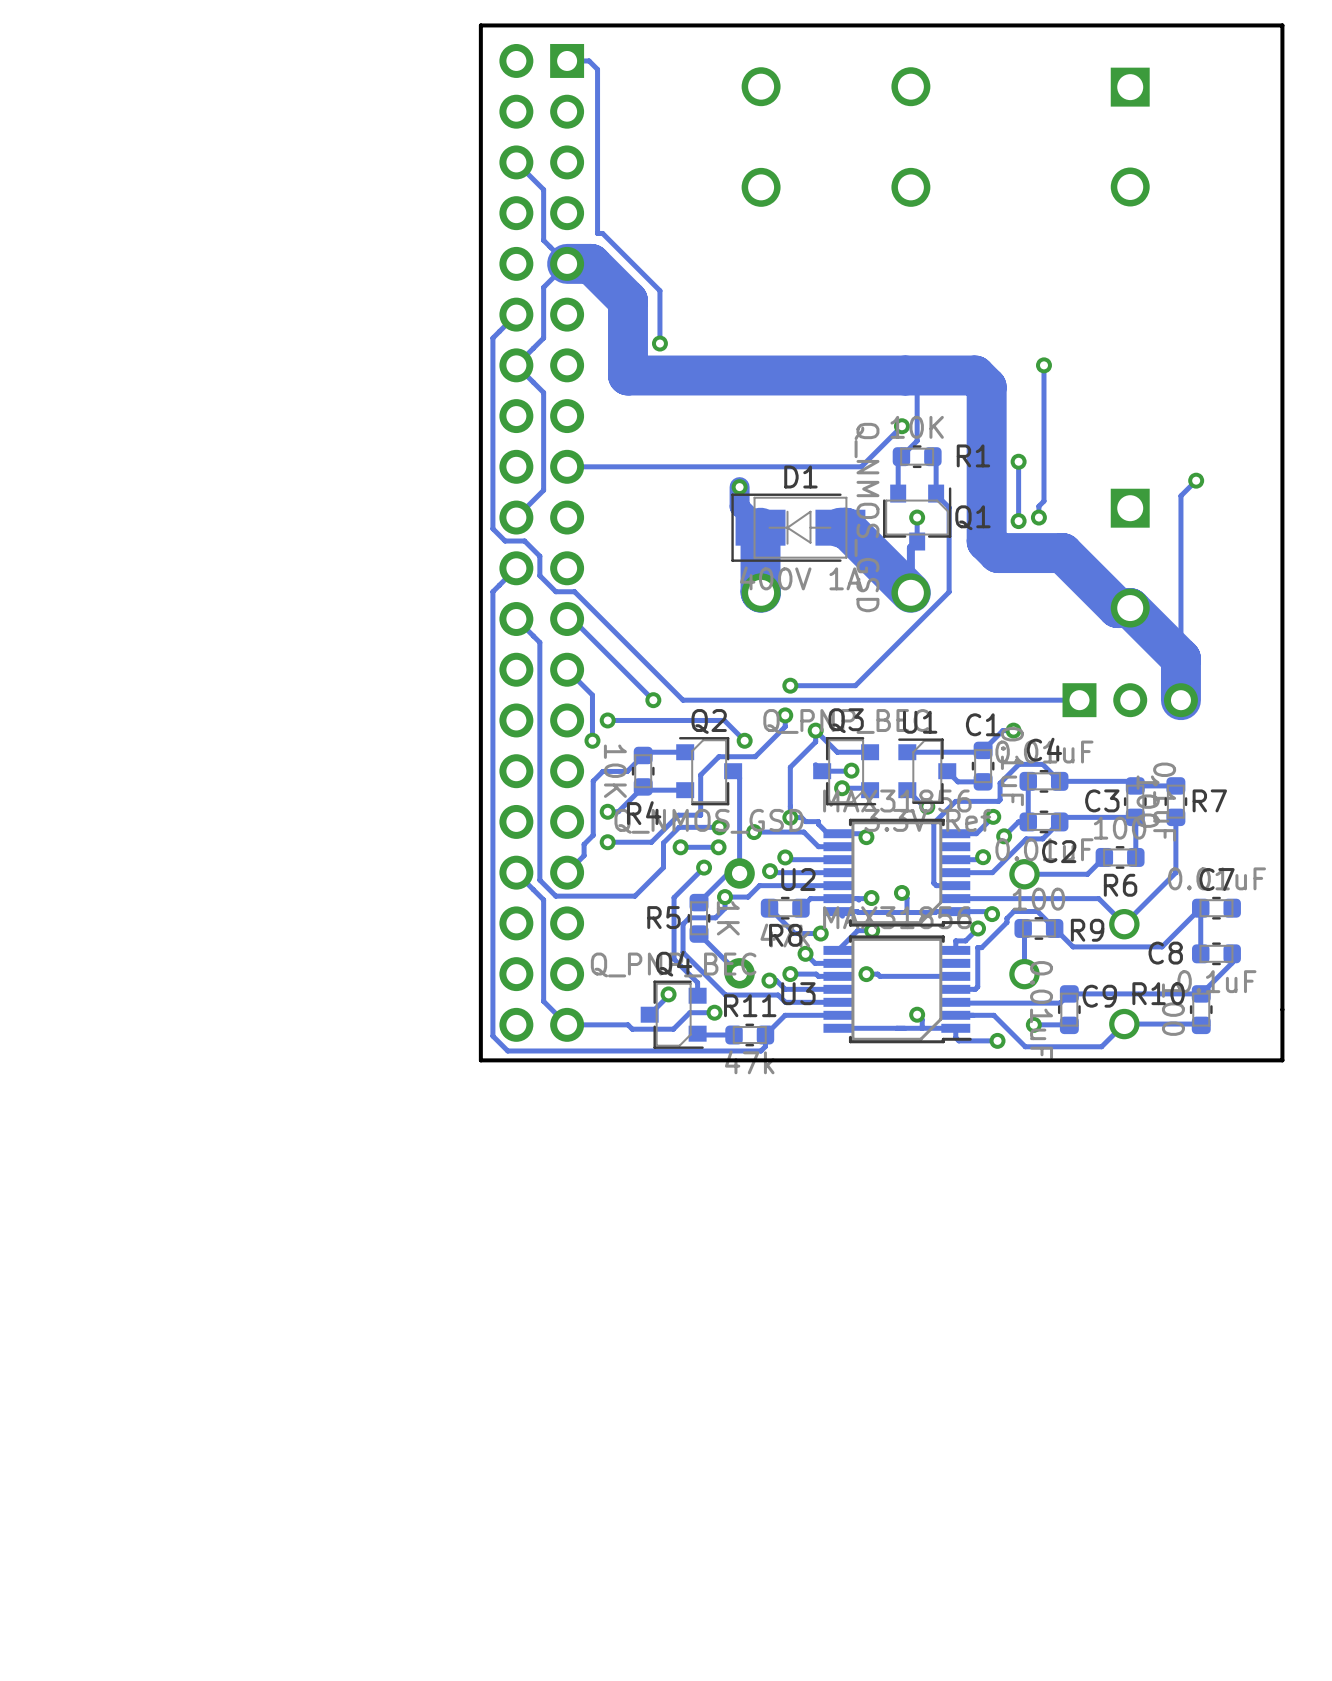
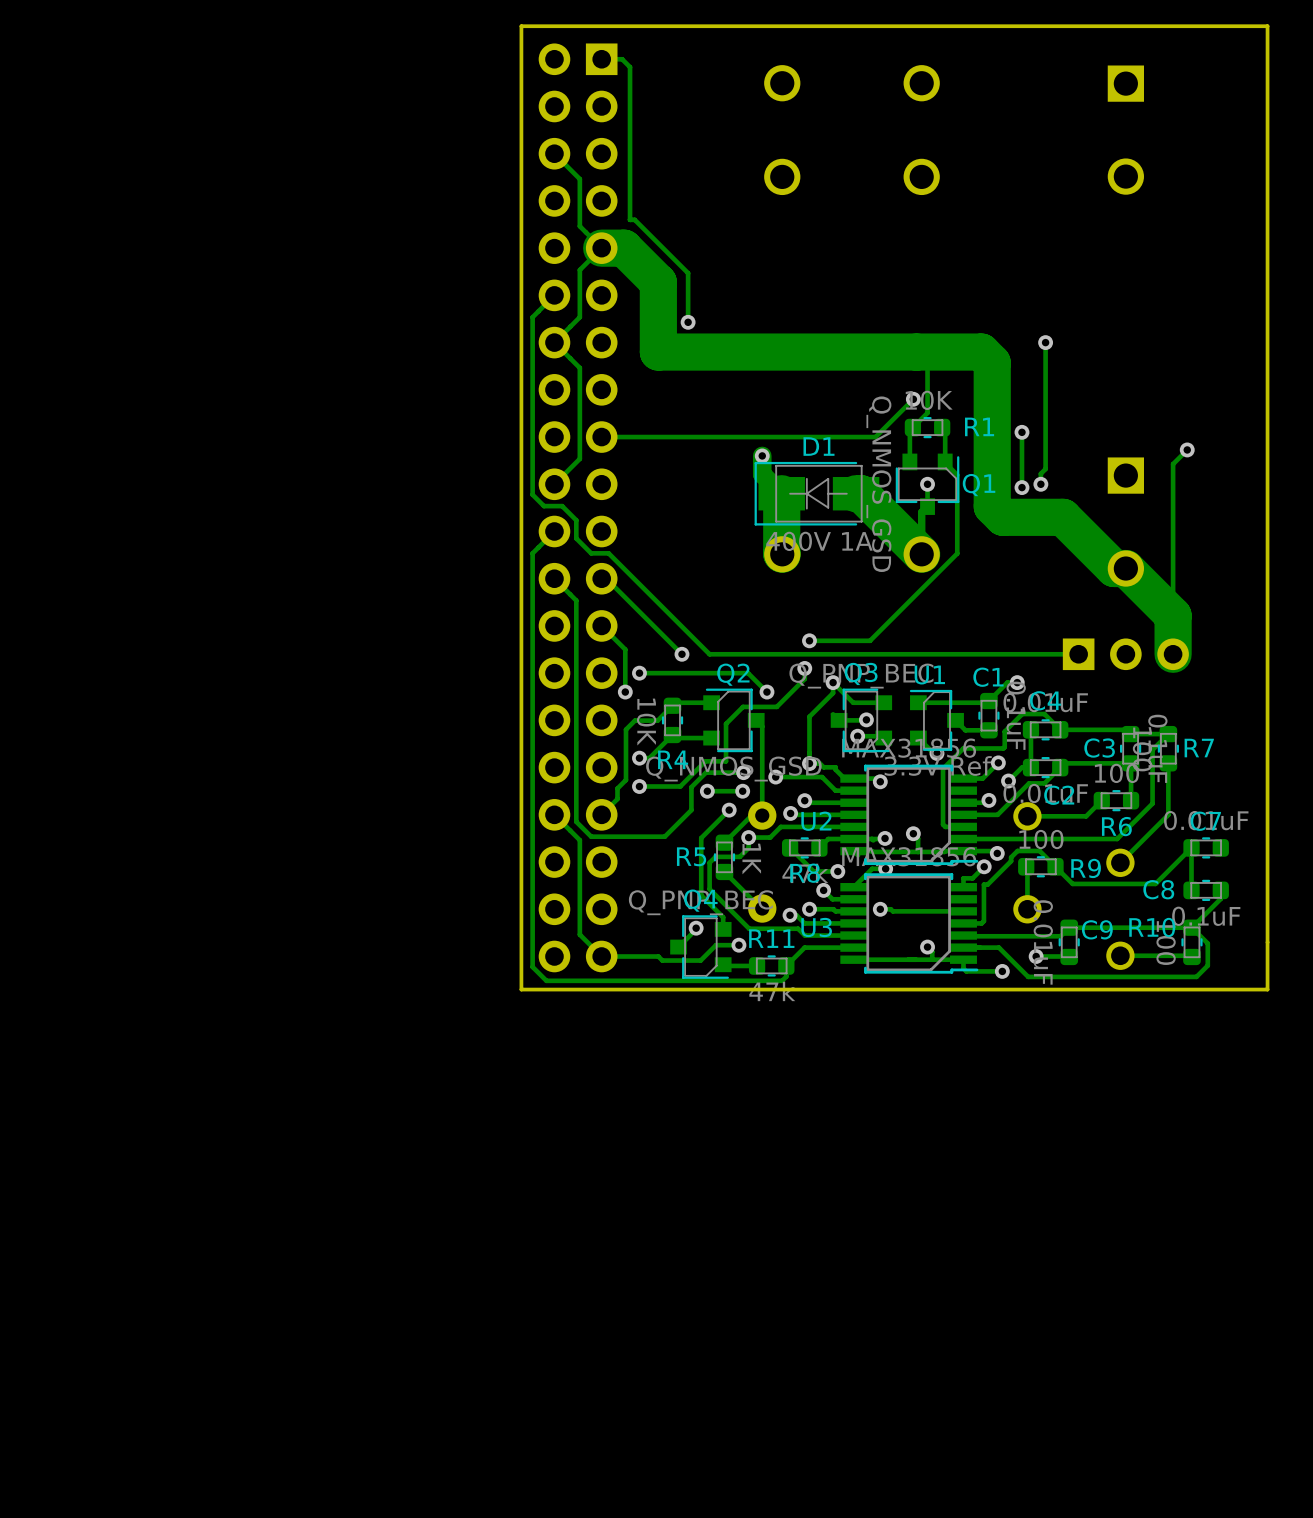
track: (1098, 898) (1124, 924) -> (1096, 839) (1117, 839) (1152, 803) (1152, 749) (1168, 734)
track: (1124, 1024) (1101, 1046) -> (1191, 927) (1207, 943) (1207, 965) (1196, 976) (1099, 976)

